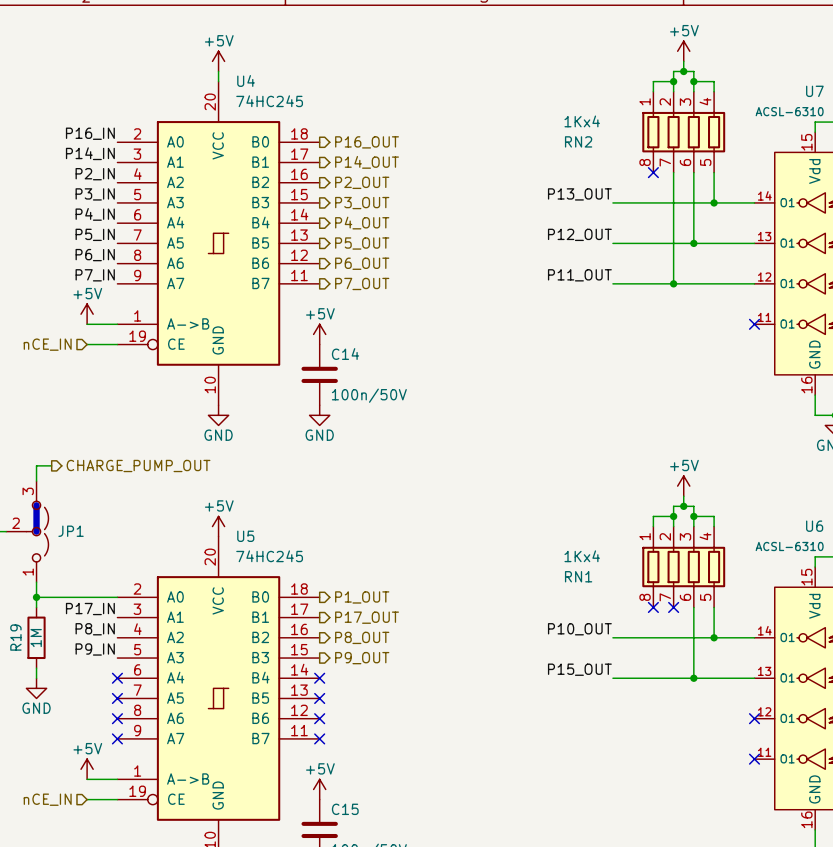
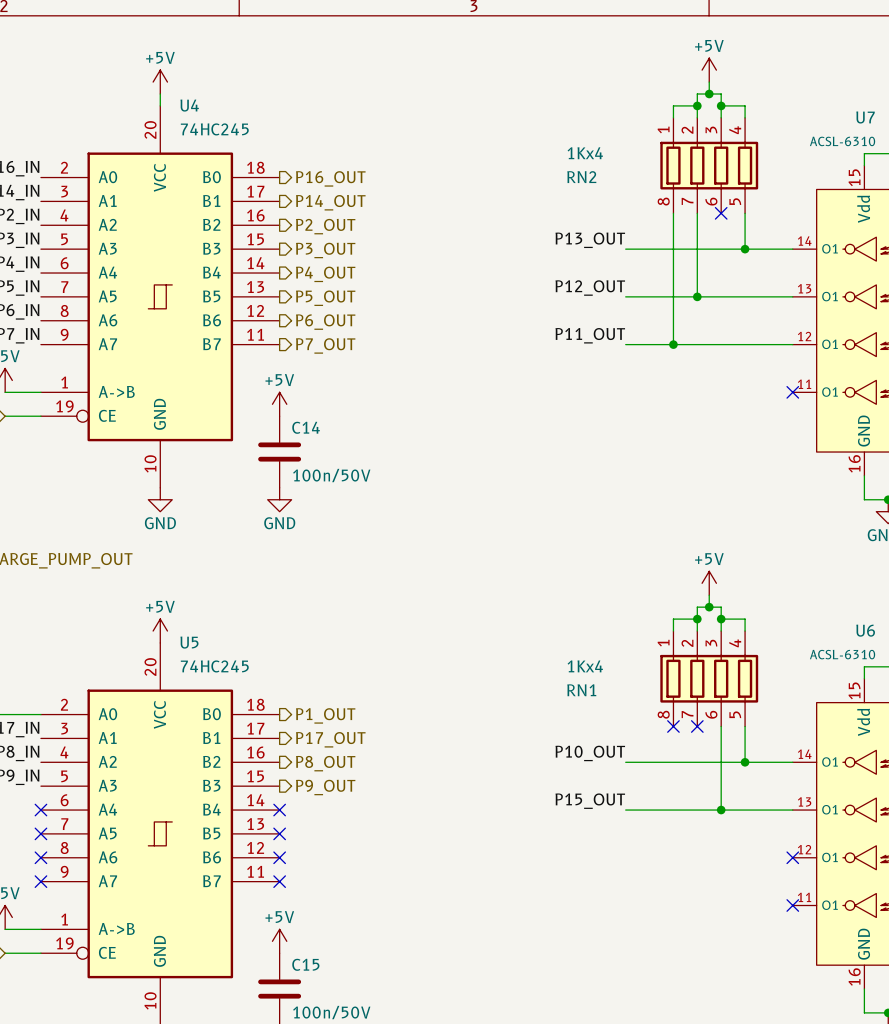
wire: none -> (673, 213) (673, 344)
no-connect mark position: (653, 172) -> (721, 213)
wire: (693, 172) (693, 243) -> none
wire: (673, 243) (673, 283) -> none
junction: none -> (697, 296)
junction: (693, 243) -> none
junction: none -> (673, 344)
junction: (673, 283) -> none

